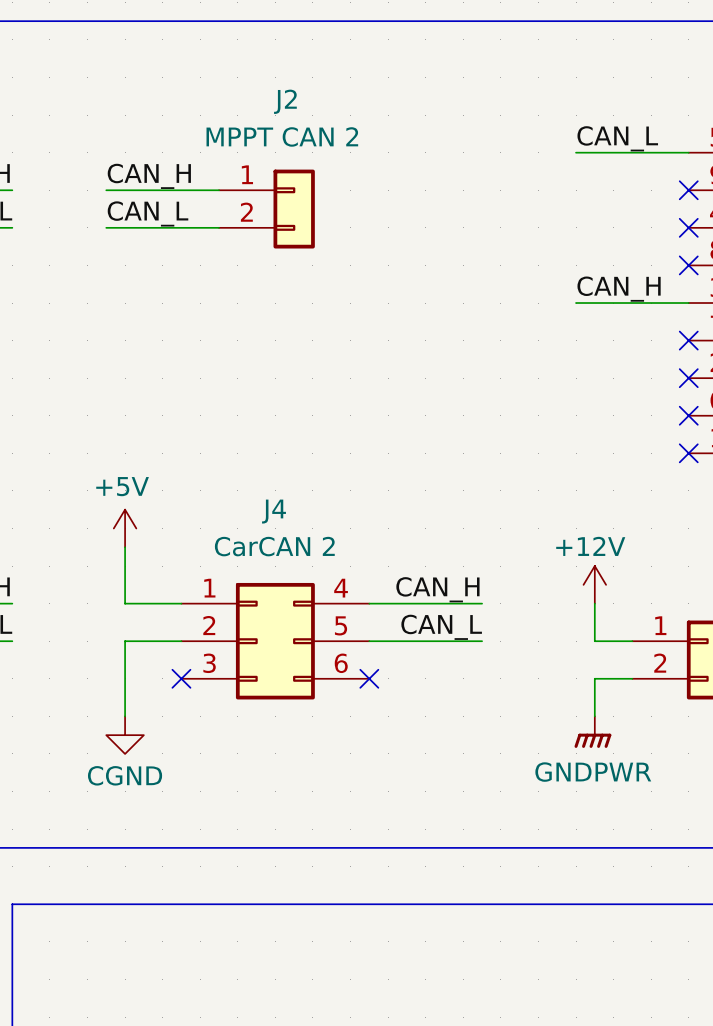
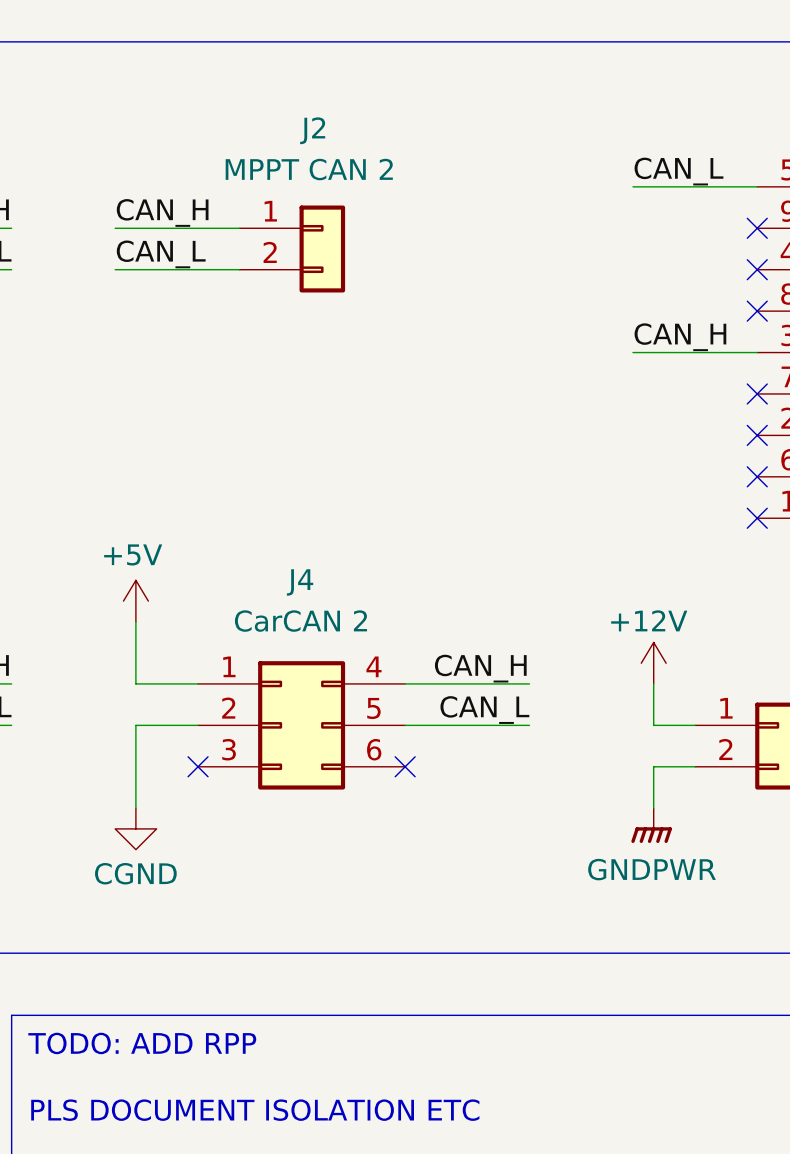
text: none -> TODO: ADD RPP (142, 1043)
text: none -> PLS DOCUMENT ISOLATION ETC (255, 1110)

